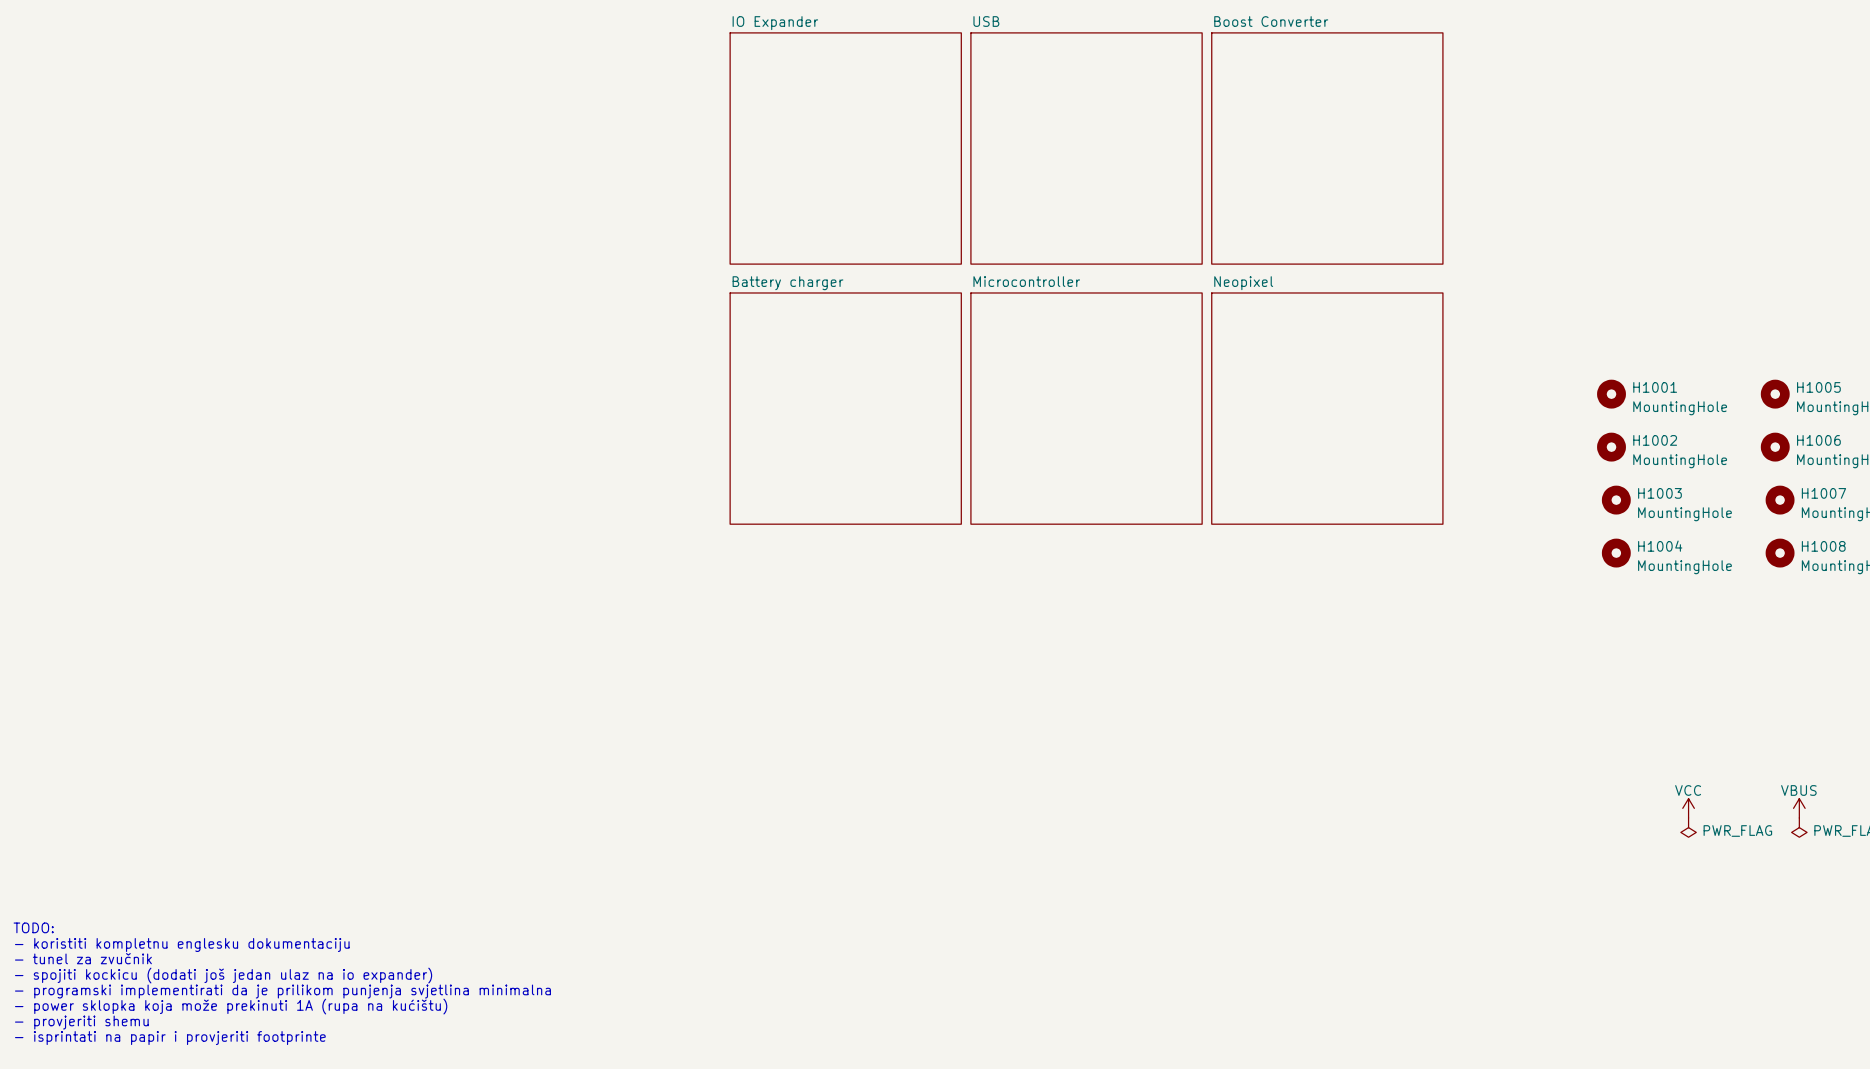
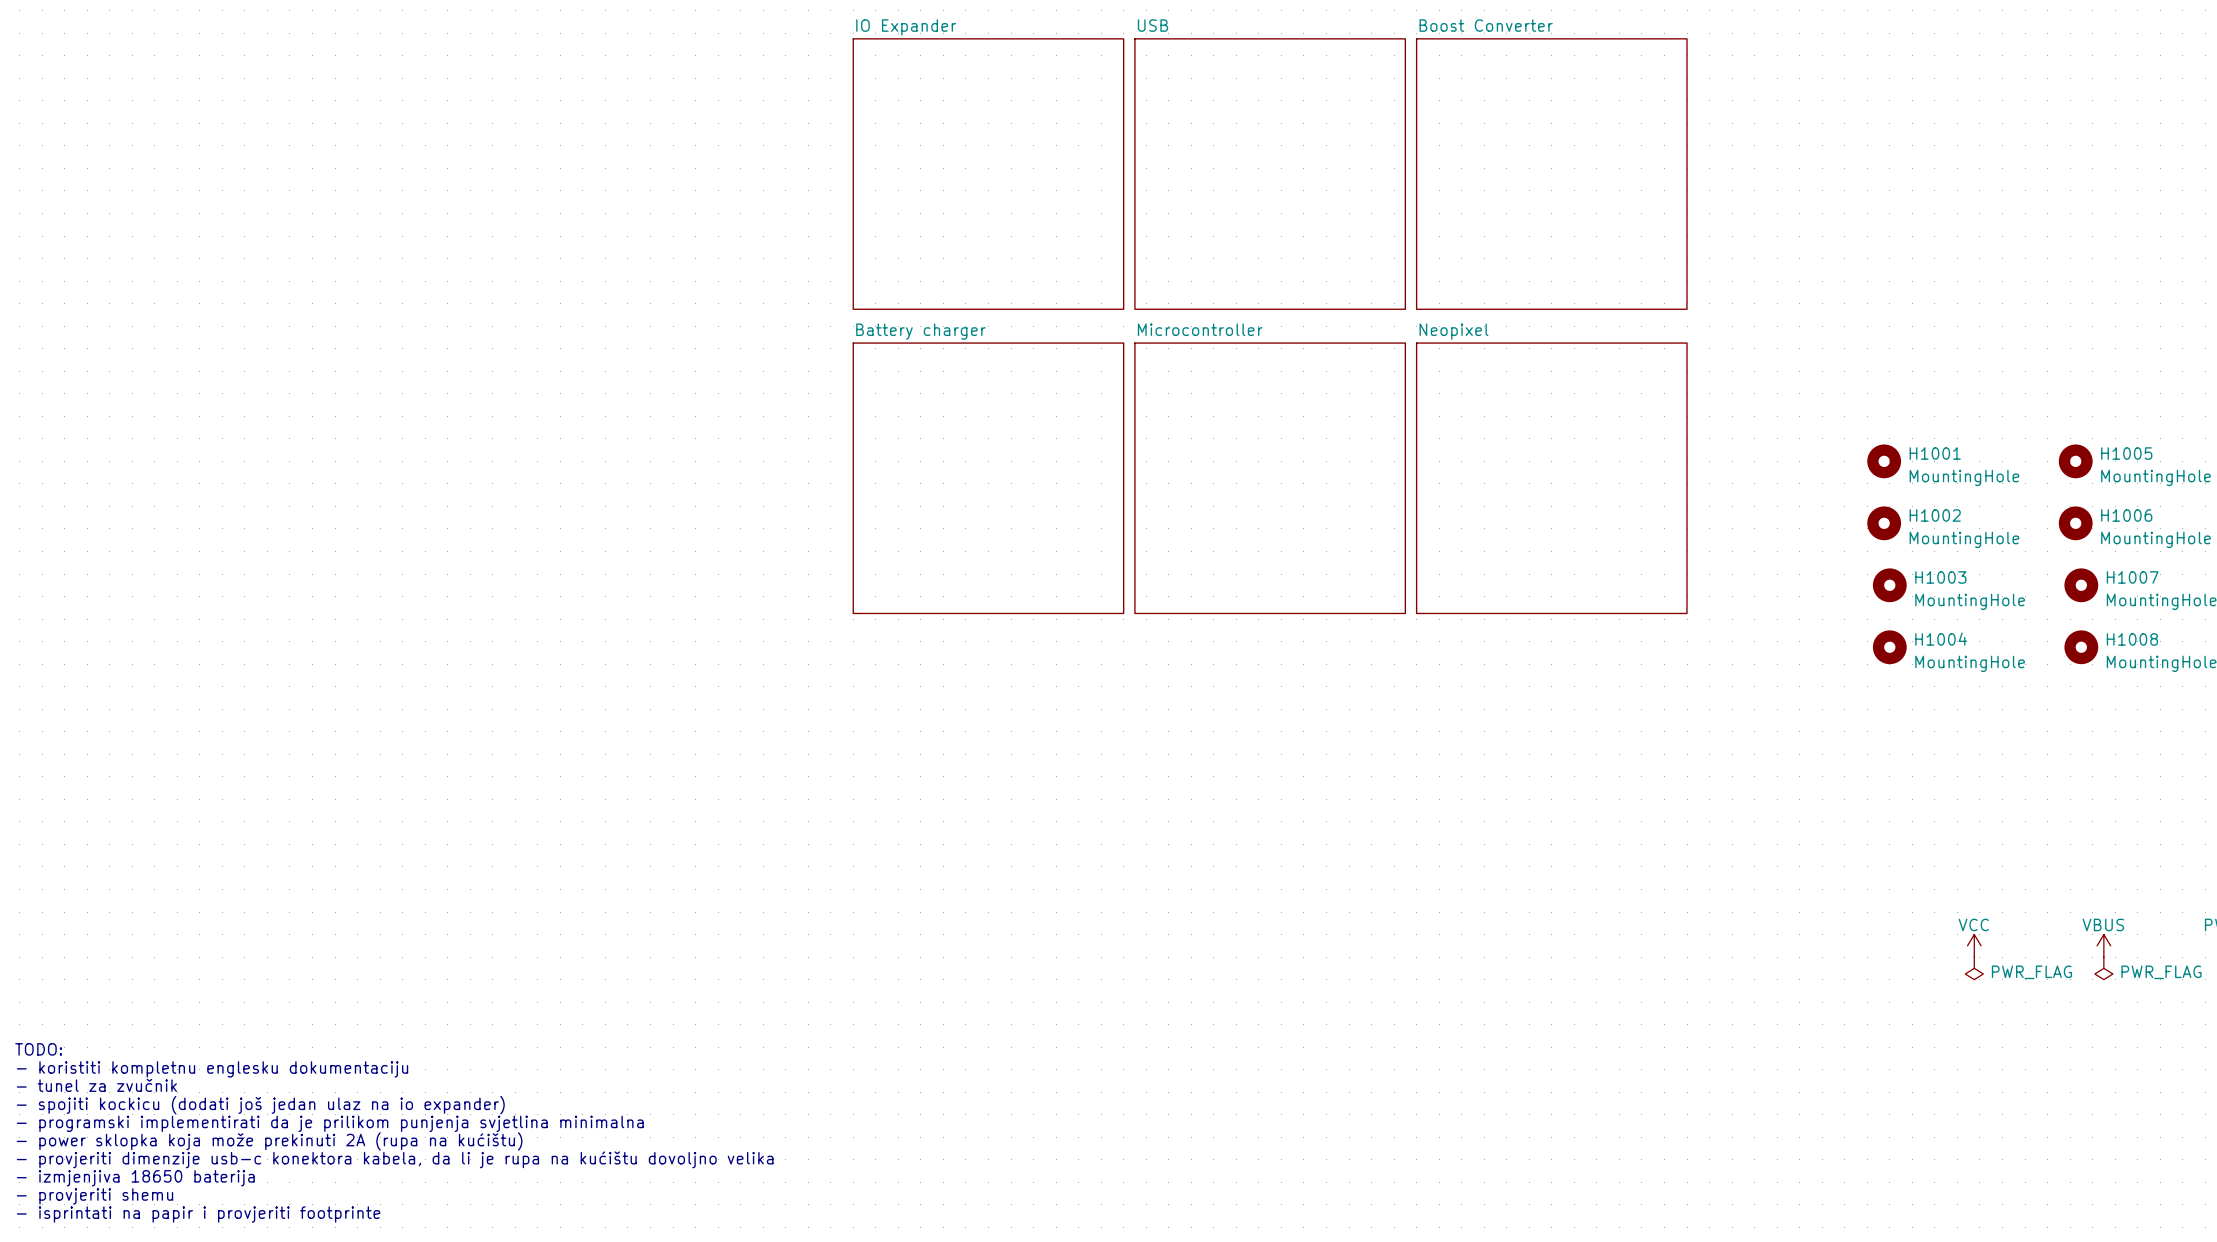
text: none -> TODO: (38, 1049)
text: none -> - koristiti kompletnu englesku dokumentaciju (212, 1069)
text: TODO: (33, 927) -> - tunel za zvučnik (96, 1085)
text: - koristiti kompletnu englesku dokumentaciju (182, 945) -> - spojiti kockicu (dodati još jedan ulaz na io expander) (260, 1105)
text: - tunel za zvučnik (83, 958) -> - programski implementirati da je prilikom punjenja svjetlina minimalna (330, 1123)
text: - spojiti kockicu (dodati još jedan ulaz na io expander) (223, 975) -> - power sklopka koja može prekinuti 2A (rupa na kućištu) (269, 1141)
text: - programski implementirati da je prilikom punjenja svjetlina minimalna (282, 991) -> - provjeriti dimenzije usb-c konektora kabela, da li je rupa na kućištu dovoljno velika (395, 1159)
text: - power sklopka koja može prekinuti 1A (rupa na kućištu) (231, 1006) -> - izmjenjiva 18650 baterija (135, 1178)

